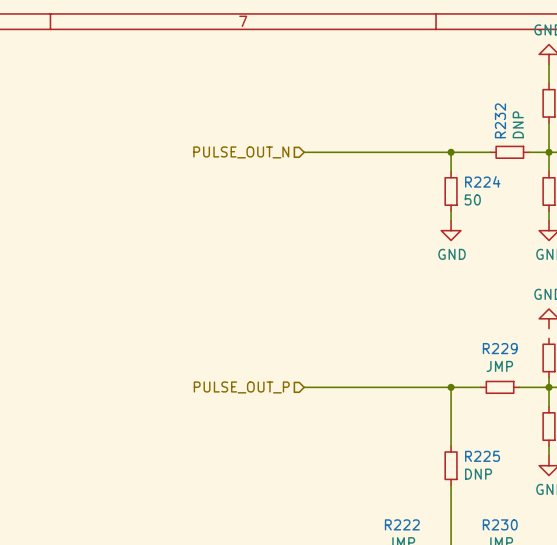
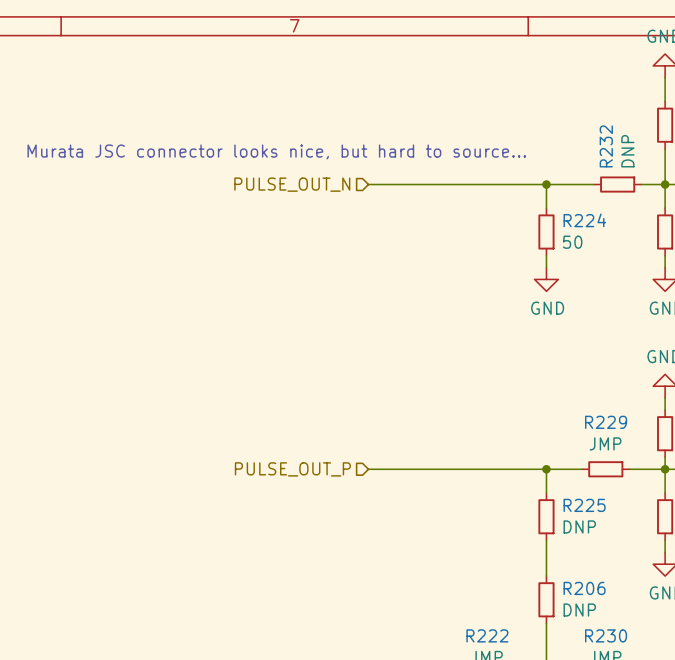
text: none -> Murata JSC connector looks nice, but hard to source... (276, 151)
wire: none -> (665, 398) (665, 409)
wire: (451, 406) (451, 446) -> (546, 576) (546, 540)
R225 position: (451, 465) -> (546, 516)
wire: (451, 485) (451, 514) -> none
R206: none -> DNP (546, 599)

